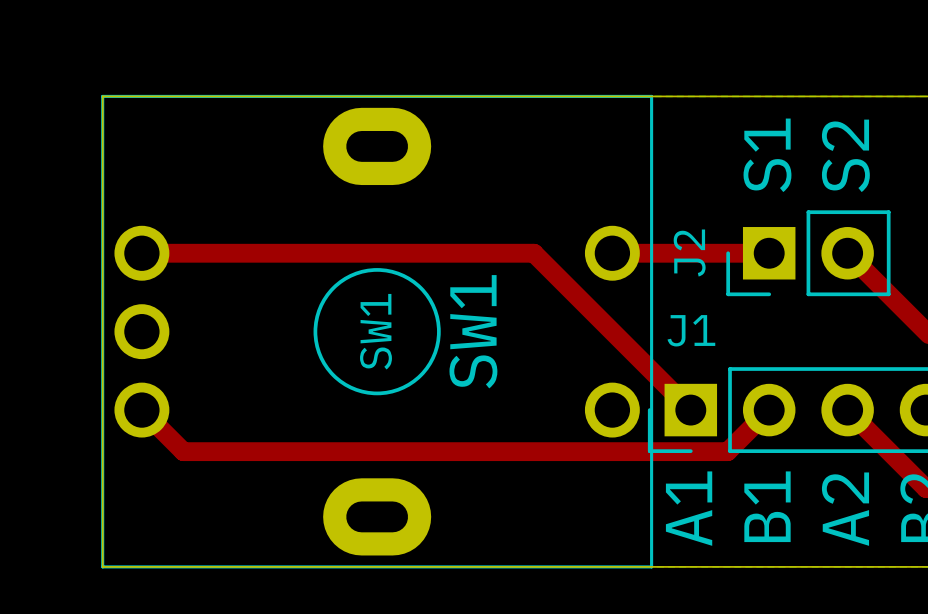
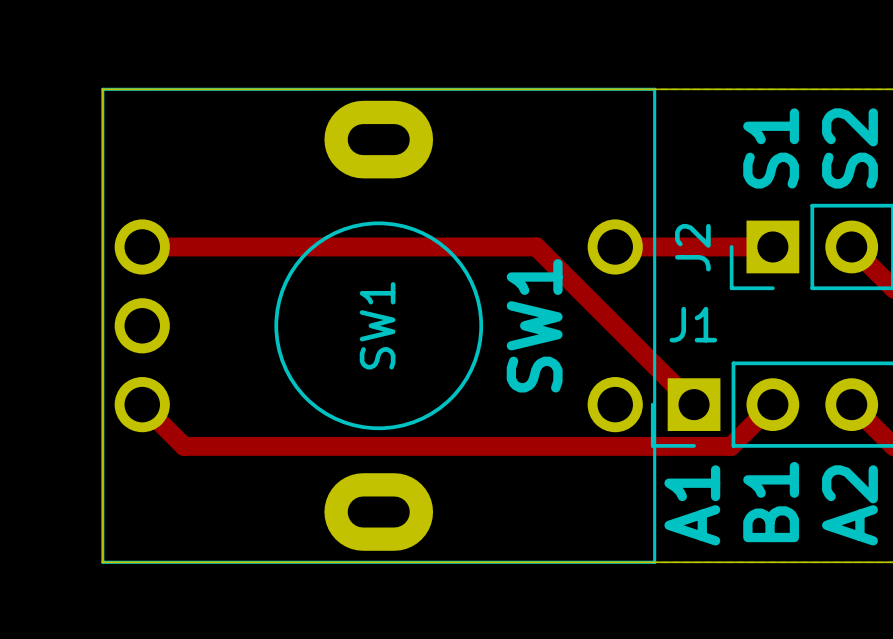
SW1 footprint: [101, 94, 654, 569] -> [101, 87, 657, 564]
text position: SW1 (473, 331) -> SW1 (534, 325)

